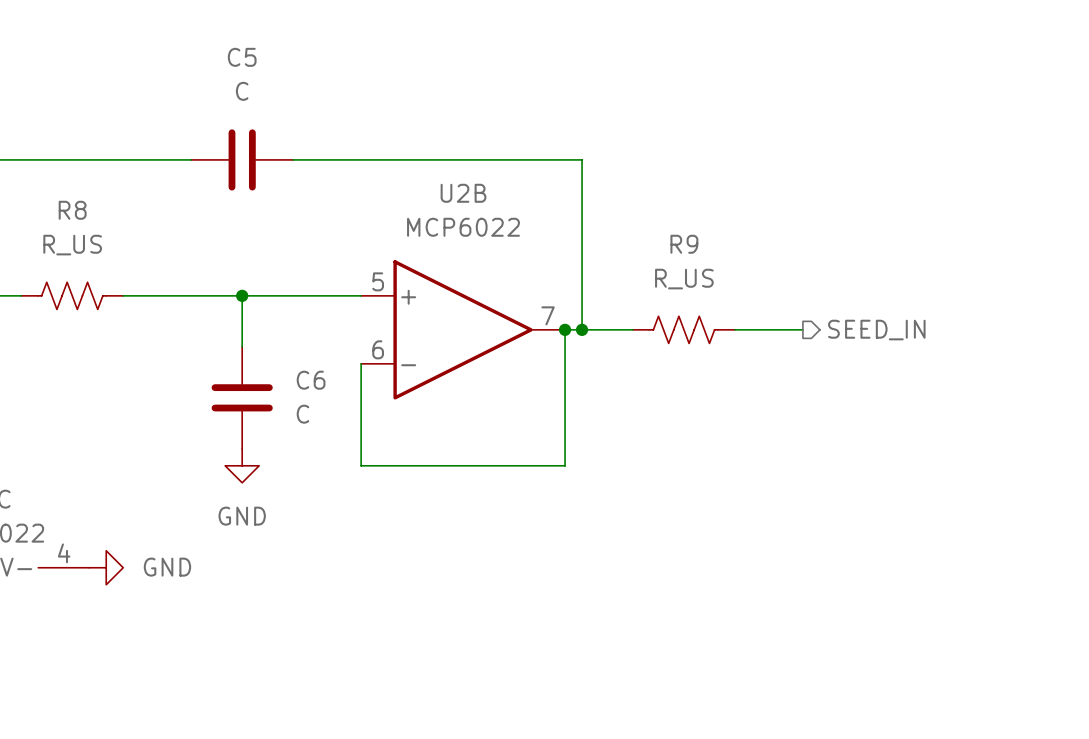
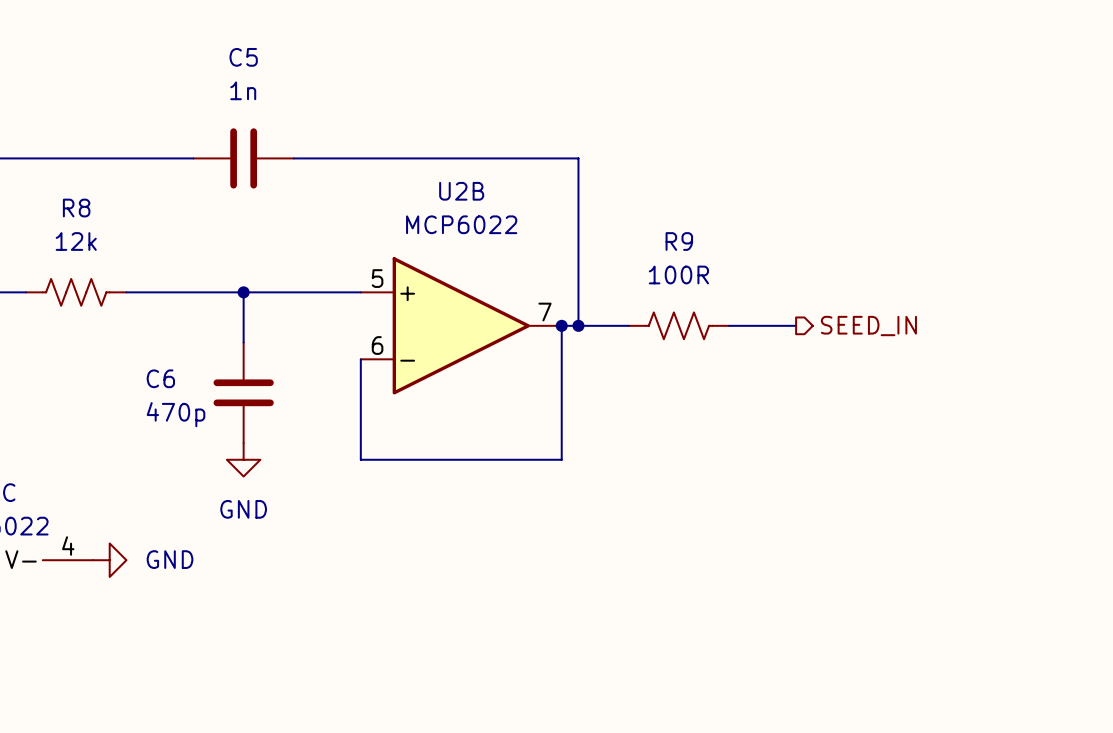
C5 value: C (242, 91) -> 1n (243, 90)
R8 value: R_US (72, 245) -> 12k (76, 241)
R9 value: R_US (684, 279) -> 100R (678, 274)
C6 name position: C6 (311, 380) -> C6 (160, 378)
C6 value: C (302, 414) -> 470p (176, 414)

